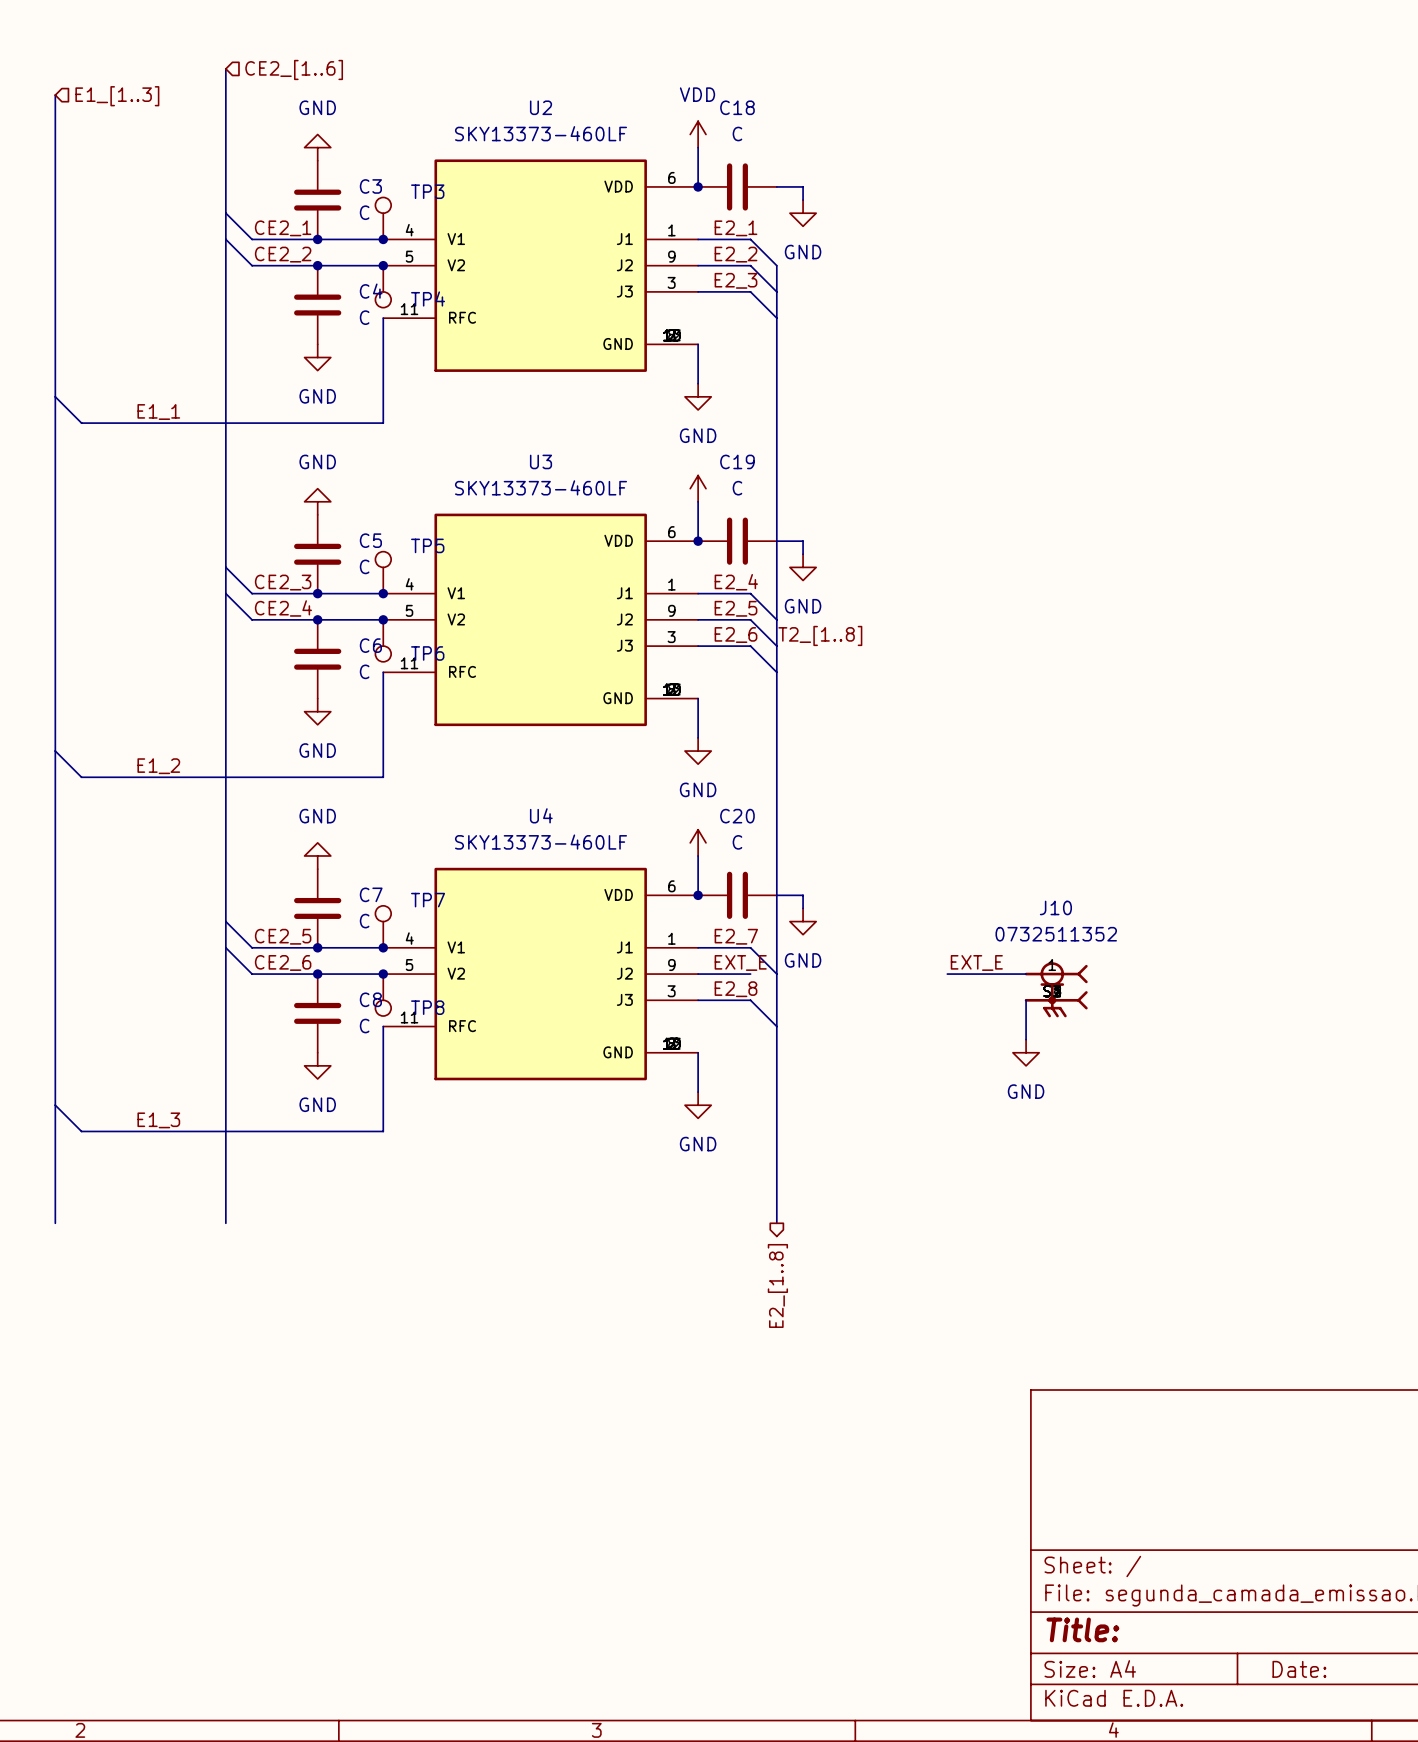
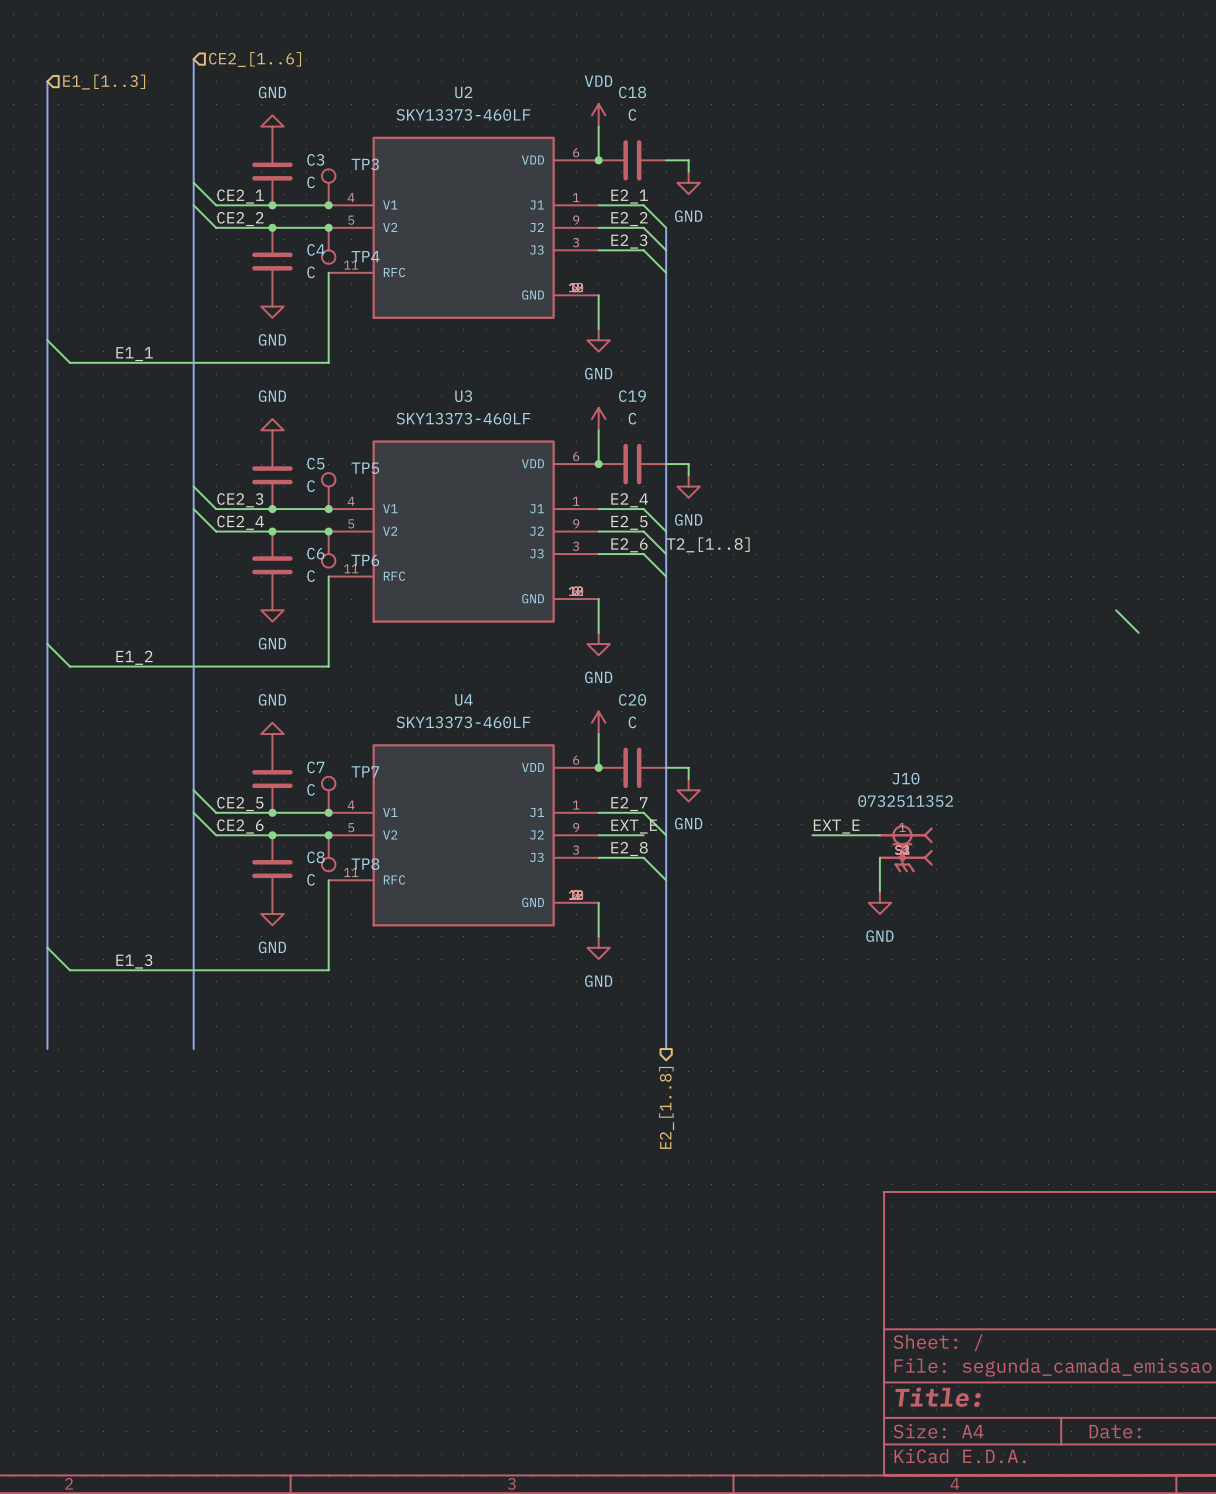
wire: none -> (1116, 610) (1138, 632)

